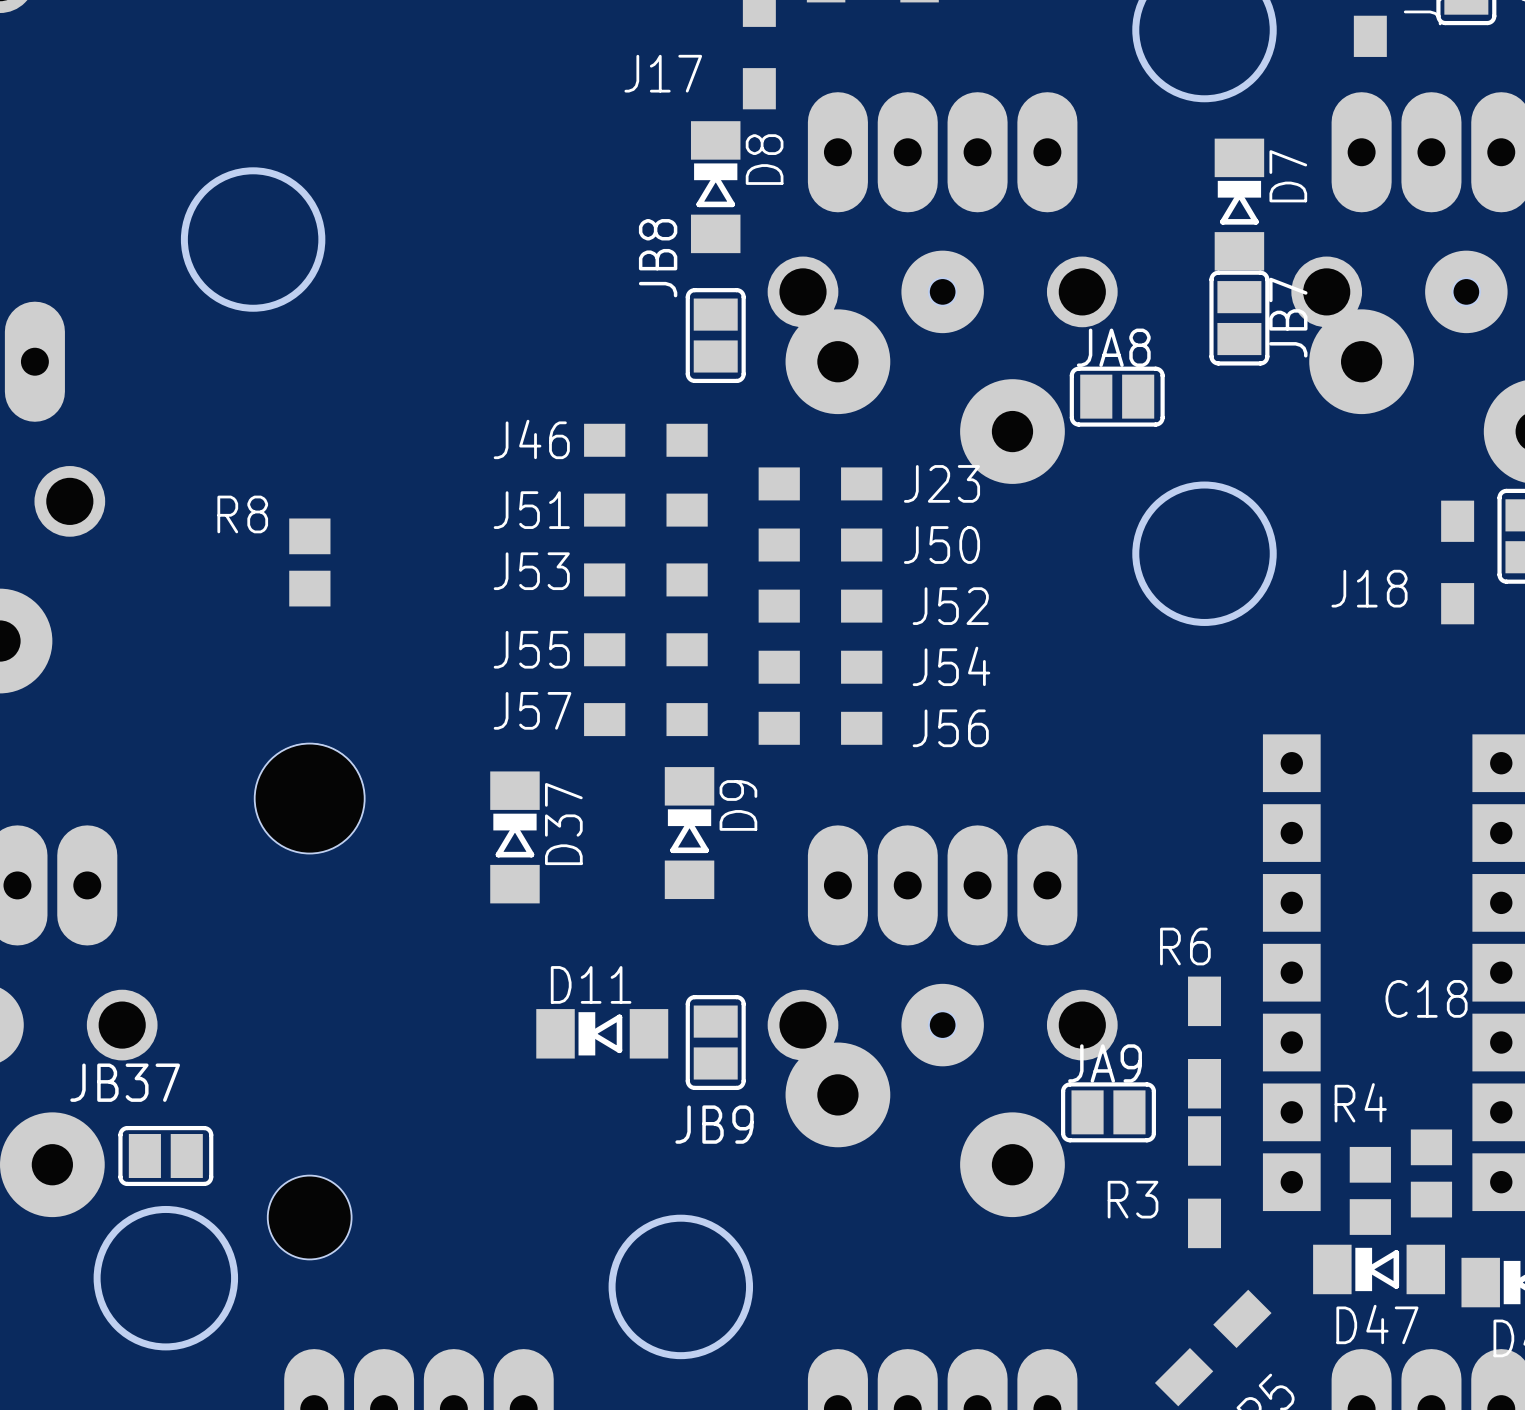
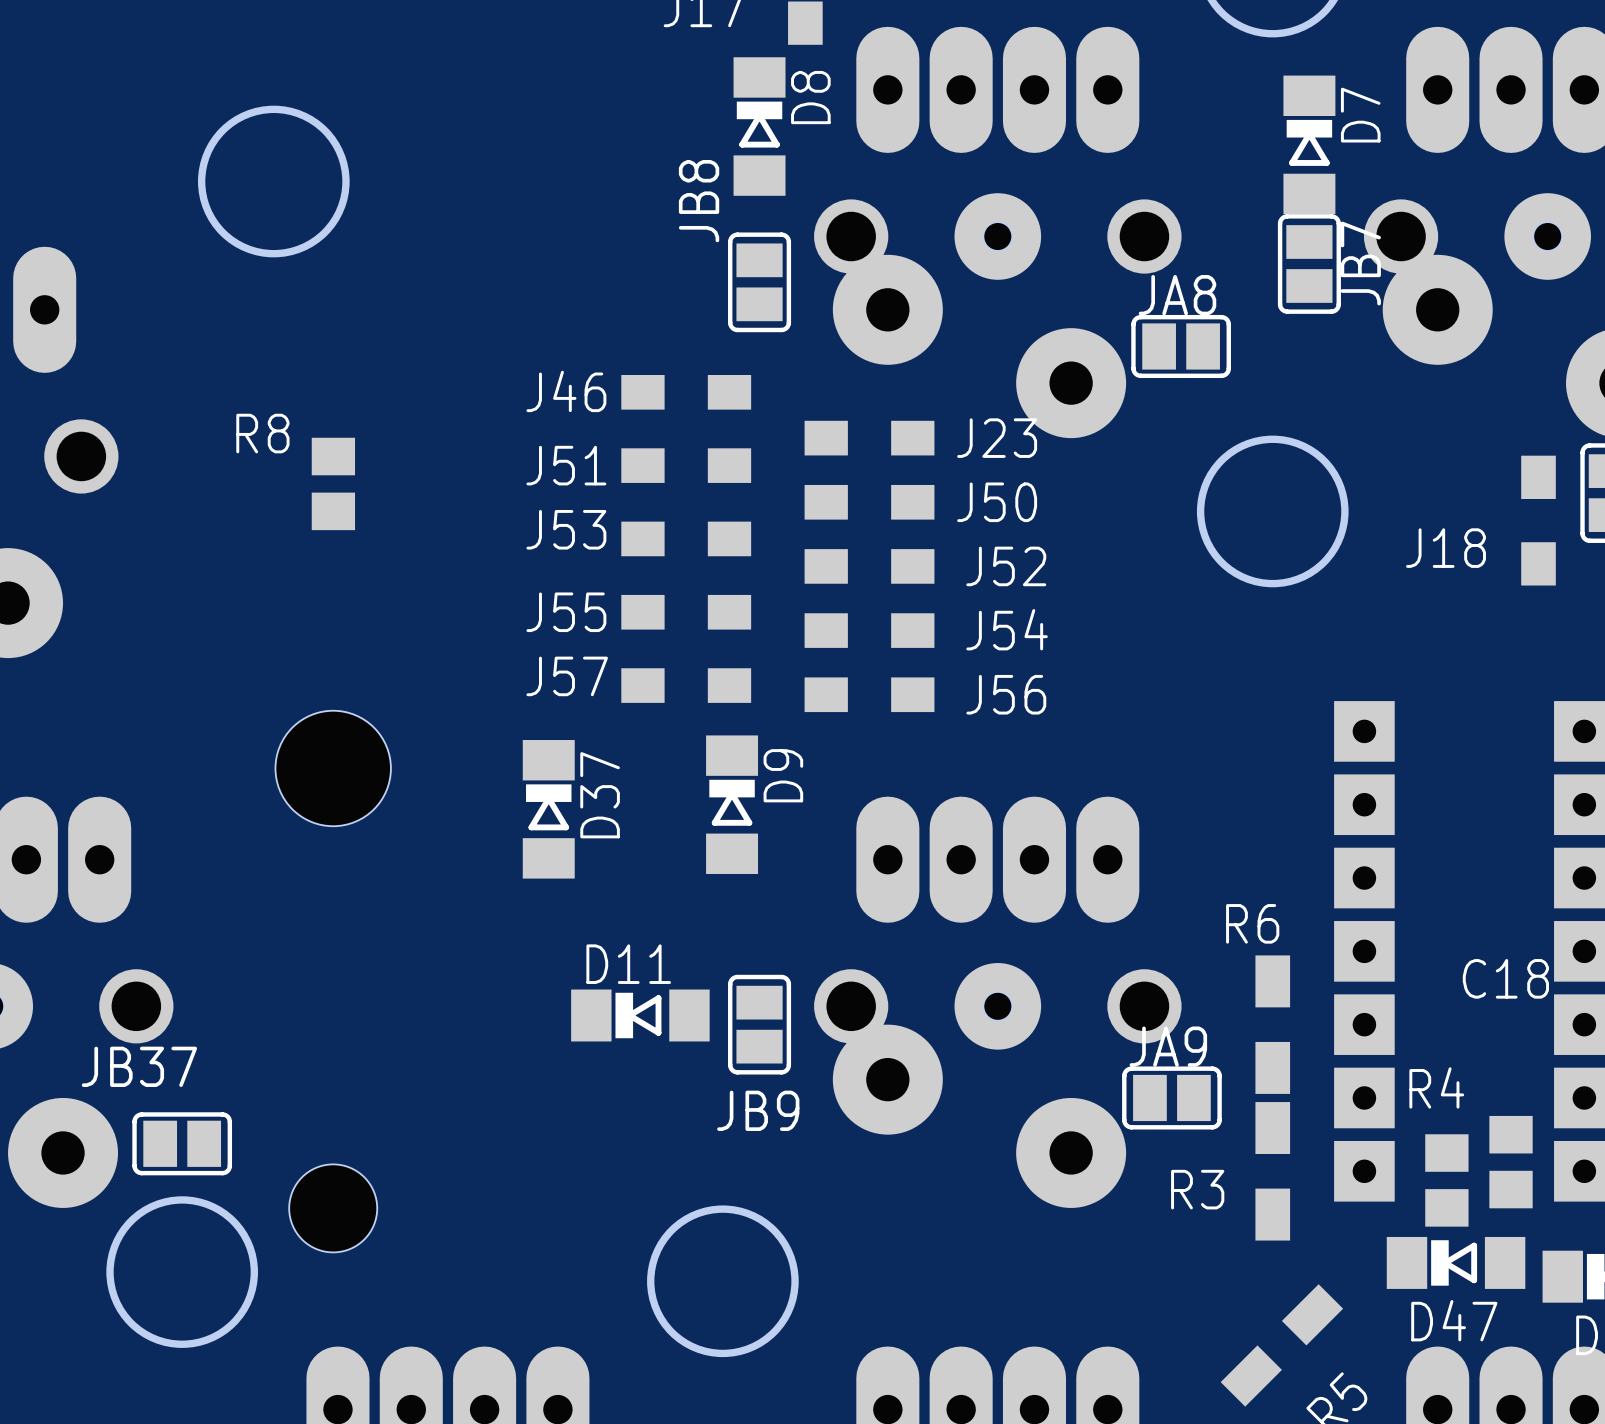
R8 position: (309, 562) -> (333, 483)

